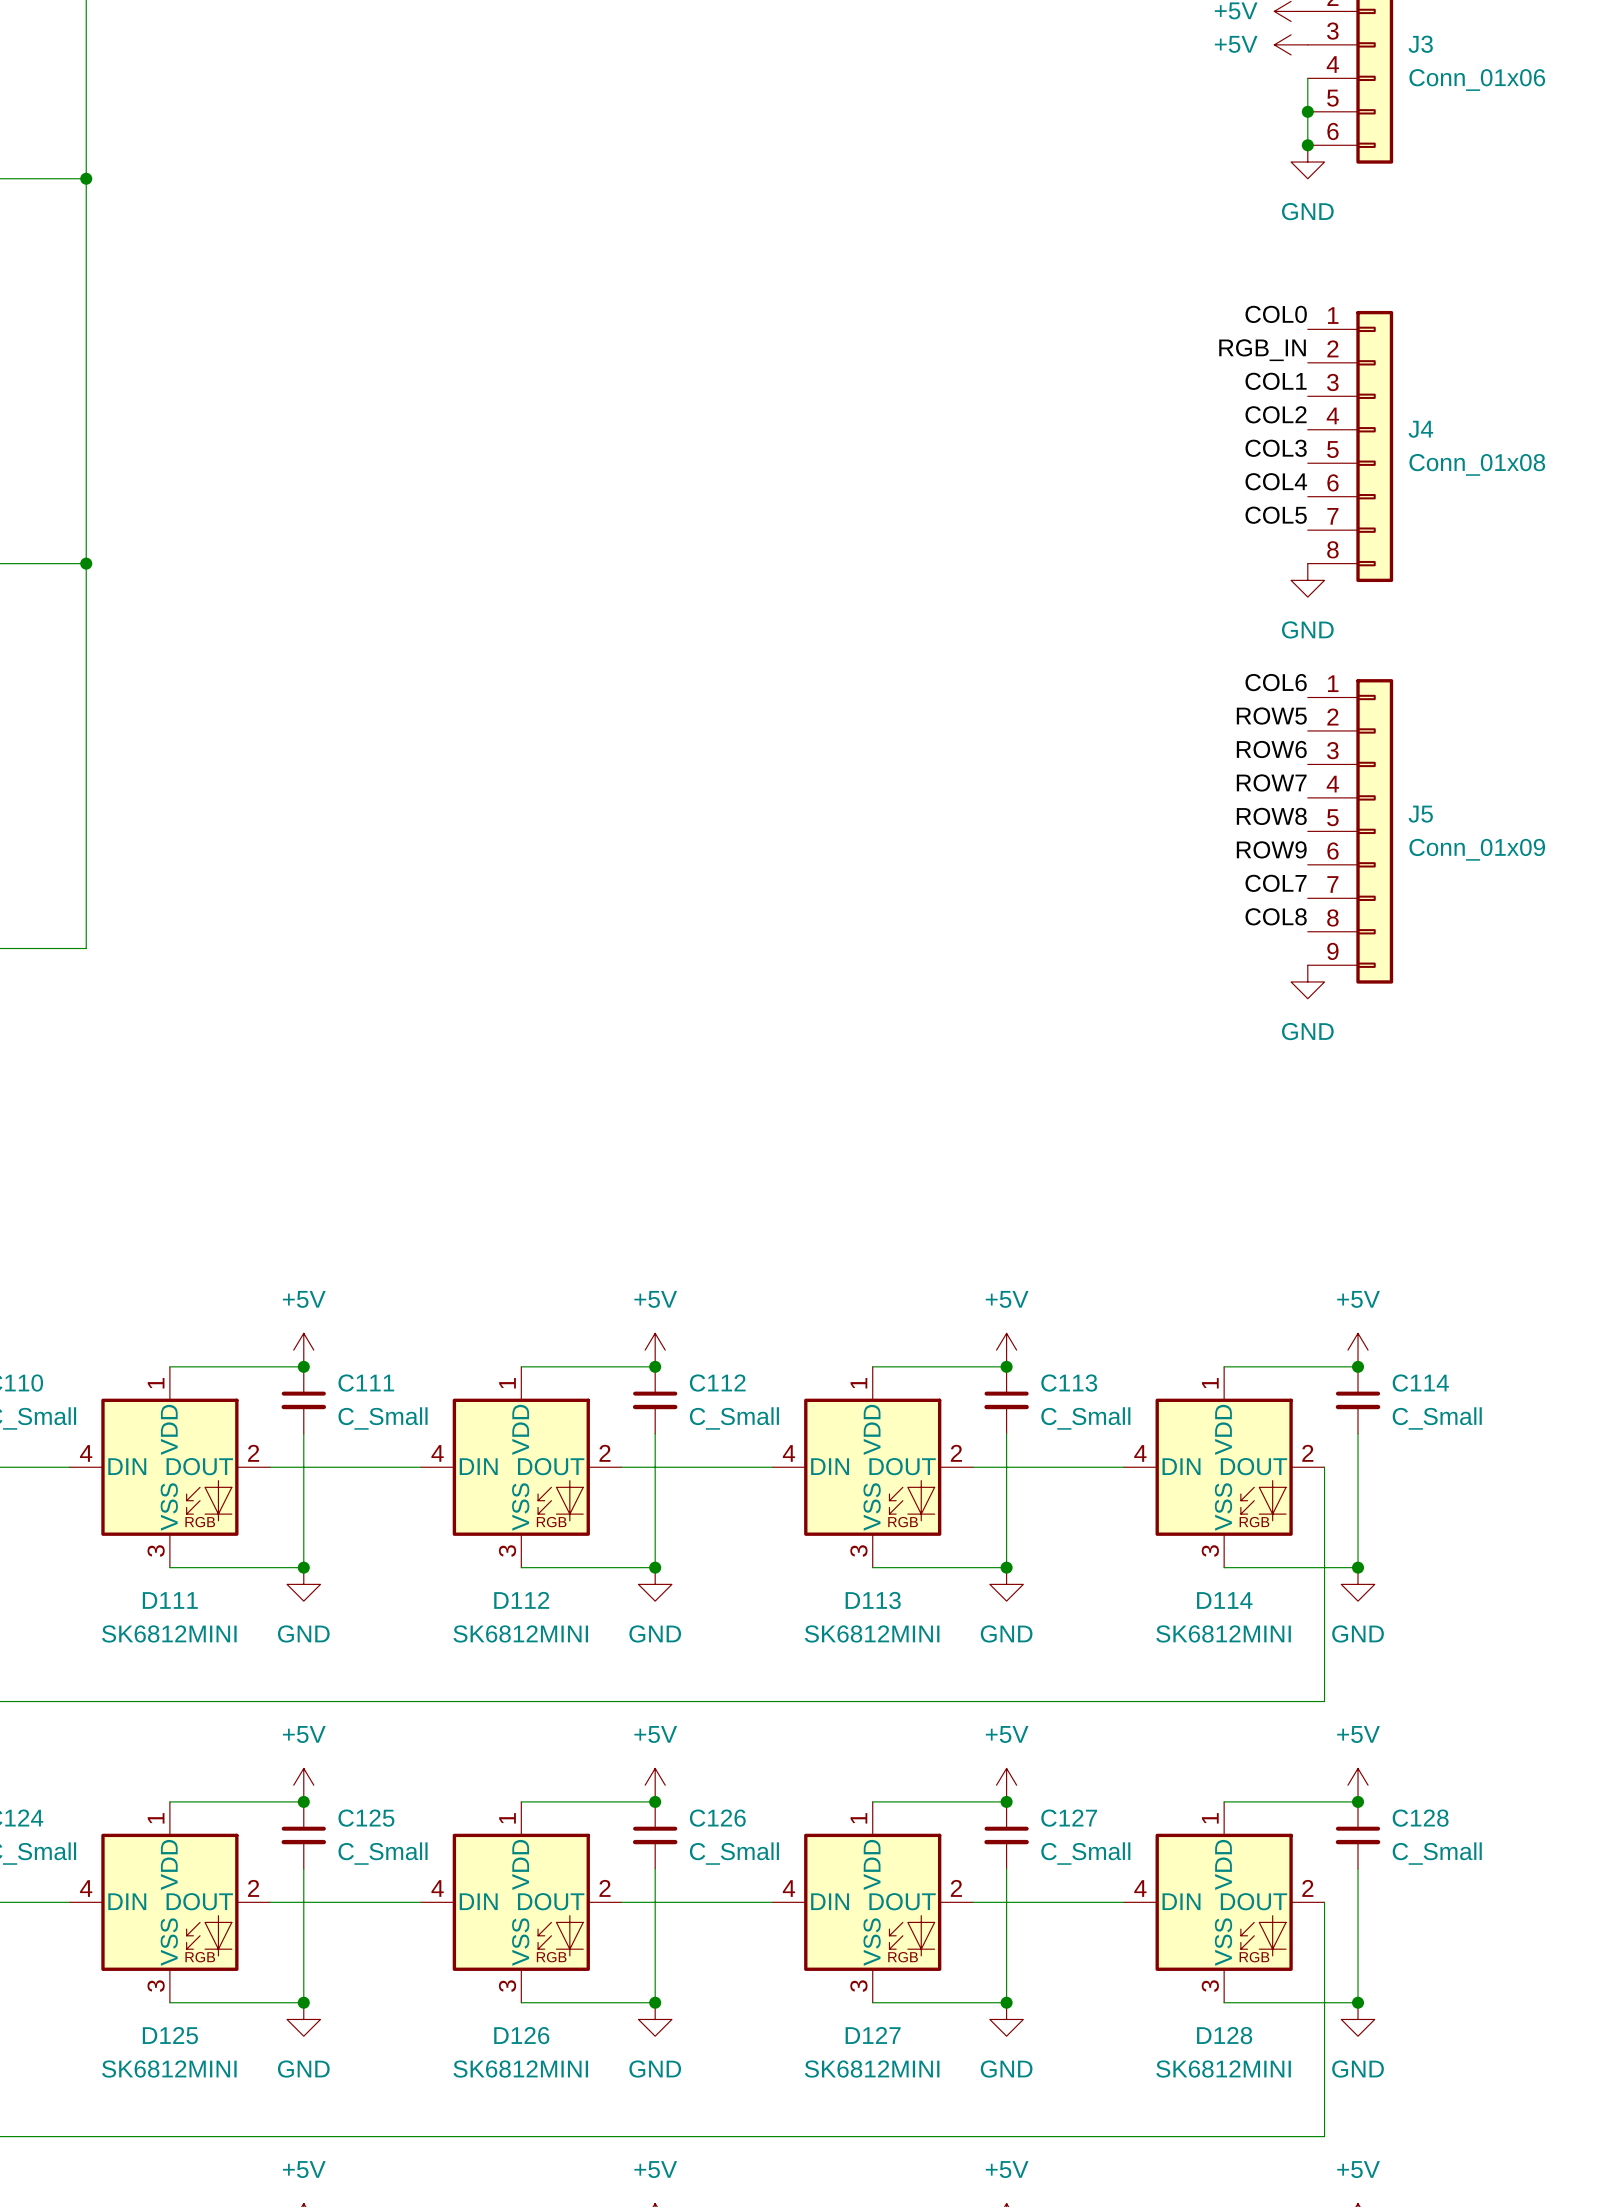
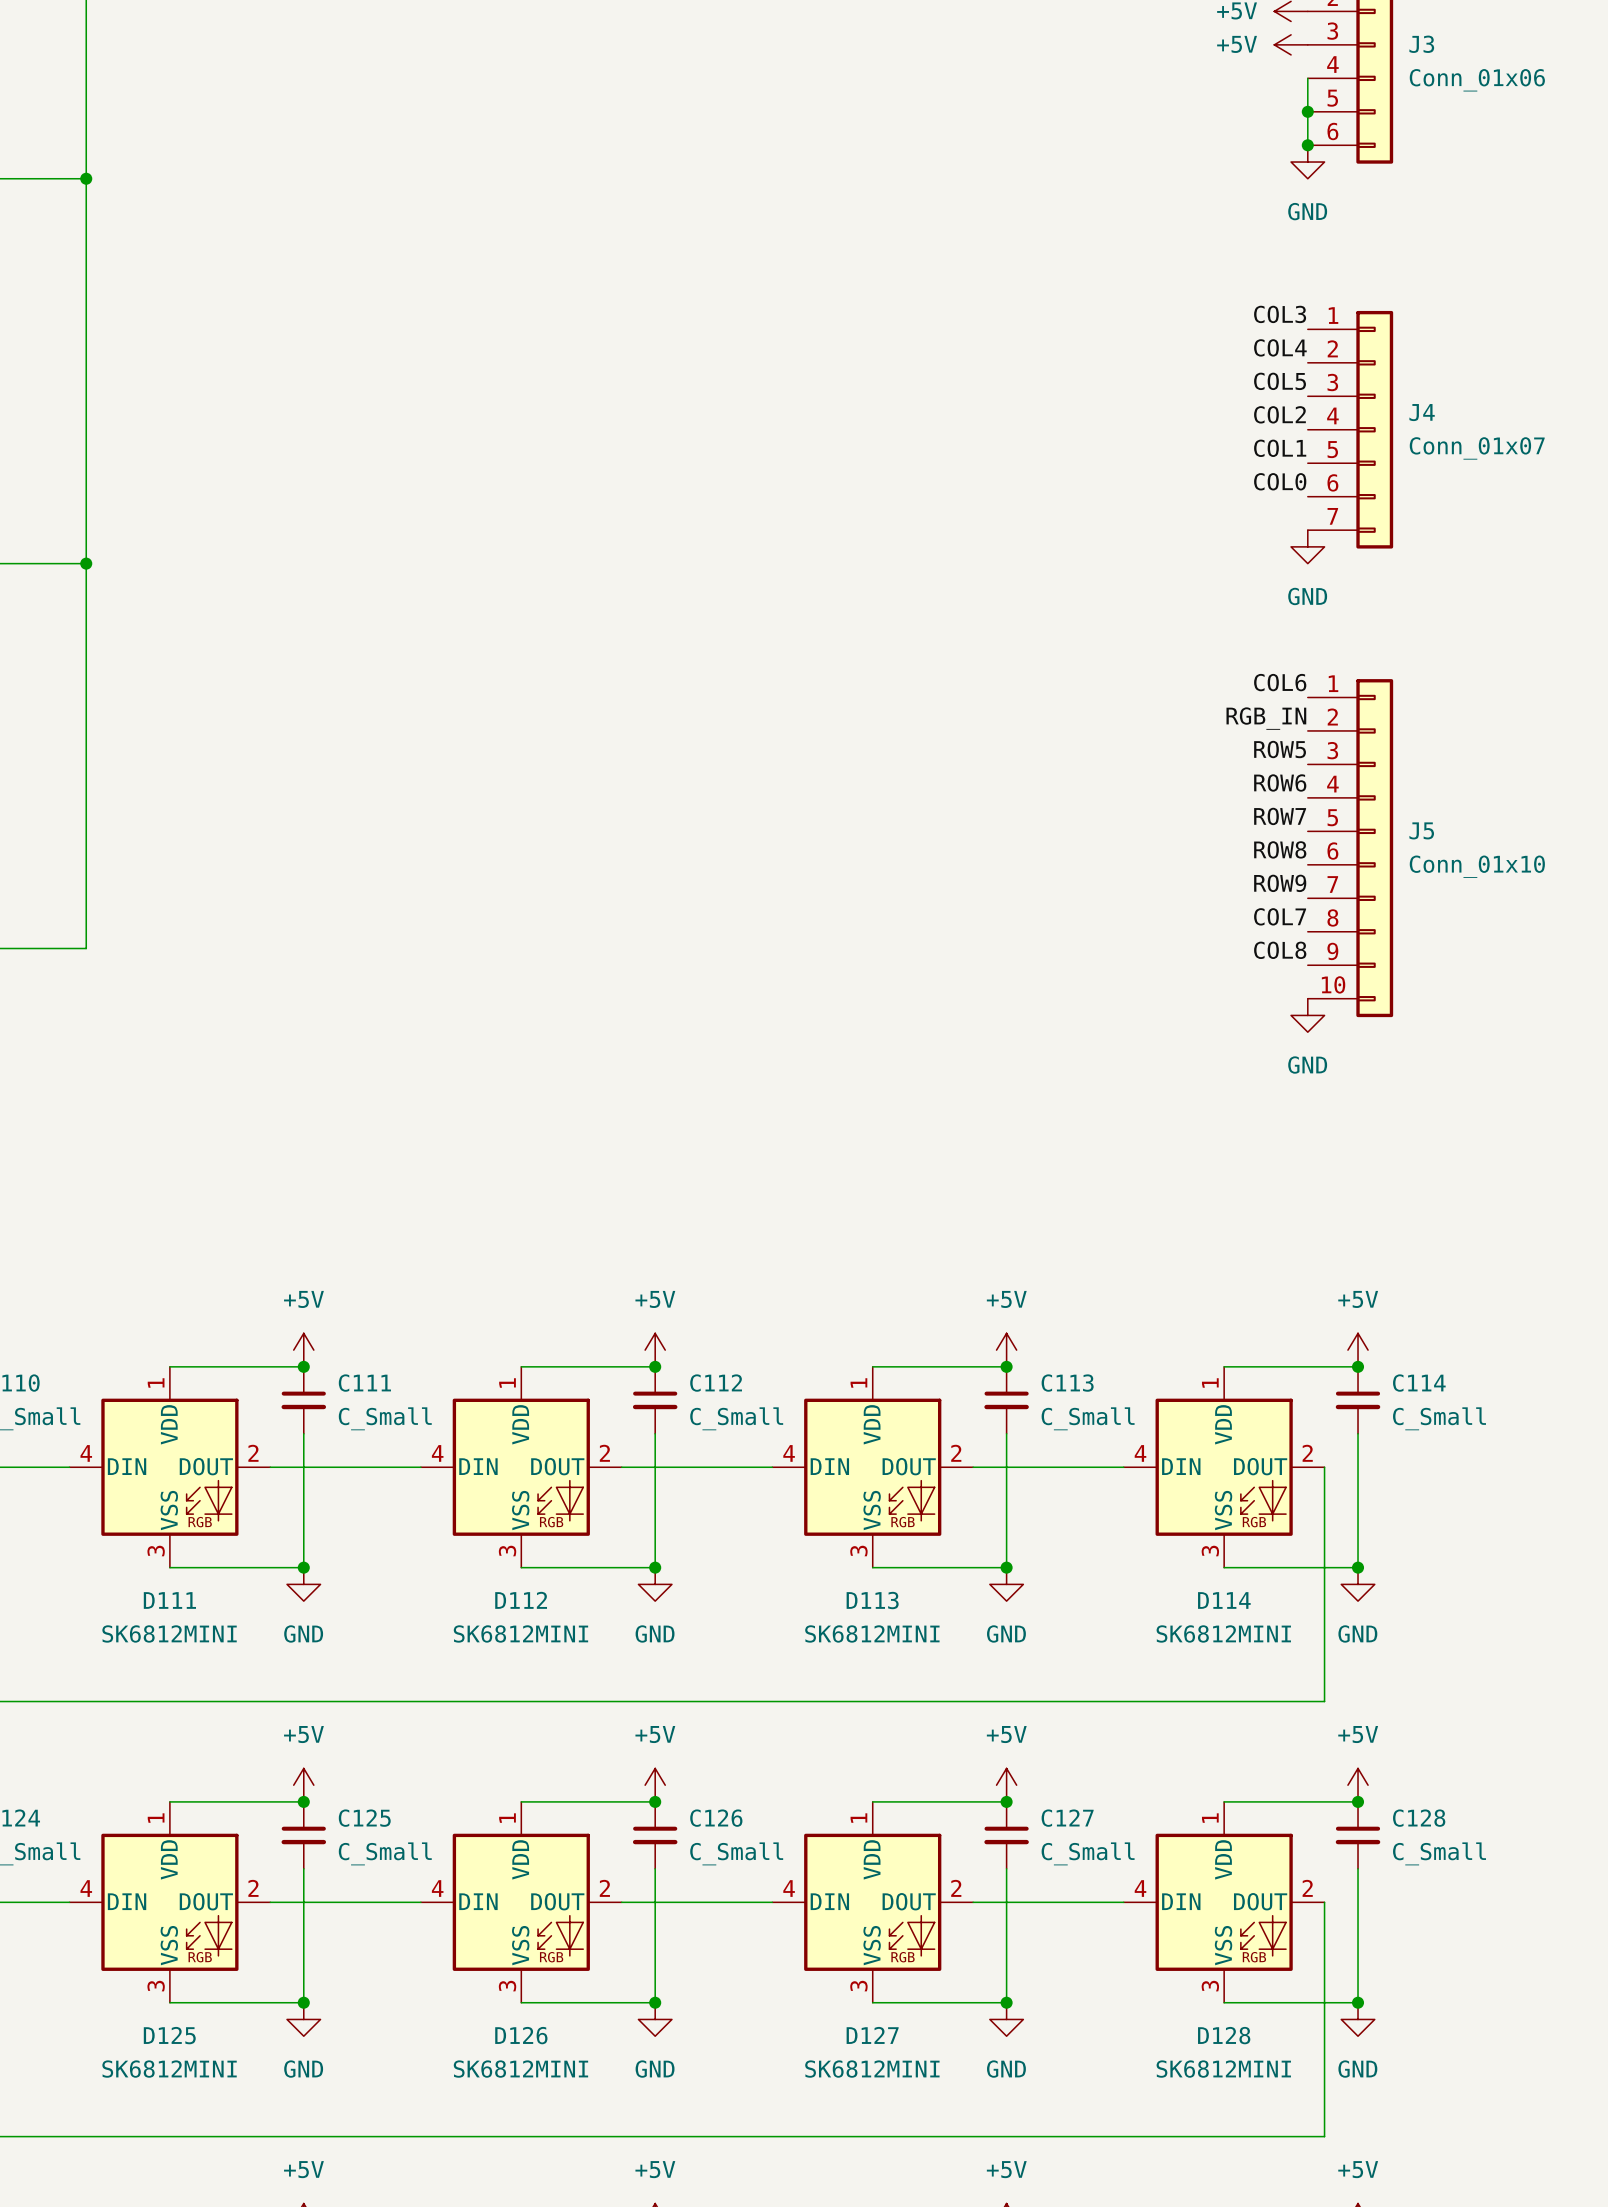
J4 symbol: [1307, 310, 1394, 583] -> [1307, 310, 1394, 549]
label: COL0 (1276, 314) -> COL3 (1280, 314)
label: RGB_IN (1262, 350) -> COL4 (1280, 347)
label: COL1 (1276, 381) -> COL5 (1280, 381)
label: COL3 (1276, 448) -> COL1 (1280, 448)
J4 value: Conn_01x08 (1477, 464) -> Conn_01x07 (1477, 448)
label: COL4 (1276, 481) -> COL0 (1280, 481)
label: COL5 (1276, 515) -> none
power symbol position: GND (1307, 580) -> GND (1307, 546)
J5 symbol: [1307, 679, 1394, 984] -> [1307, 679, 1394, 1018]
label: ROW5 (1271, 716) -> RGB_IN (1266, 718)
label: ROW6 (1271, 749) -> ROW5 (1280, 749)
label: ROW7 (1271, 782) -> ROW6 (1280, 782)
label: ROW8 (1271, 816) -> ROW7 (1280, 816)
label: ROW9 (1271, 849) -> ROW8 (1280, 849)
J5 value: Conn_01x09 (1477, 849) -> Conn_01x10 (1477, 866)
label: COL7 (1276, 883) -> ROW9 (1280, 883)
label: COL8 (1276, 916) -> COL7 (1280, 916)
label: none -> COL8 (1280, 950)
power symbol position: GND (1307, 981) -> GND (1307, 1015)

